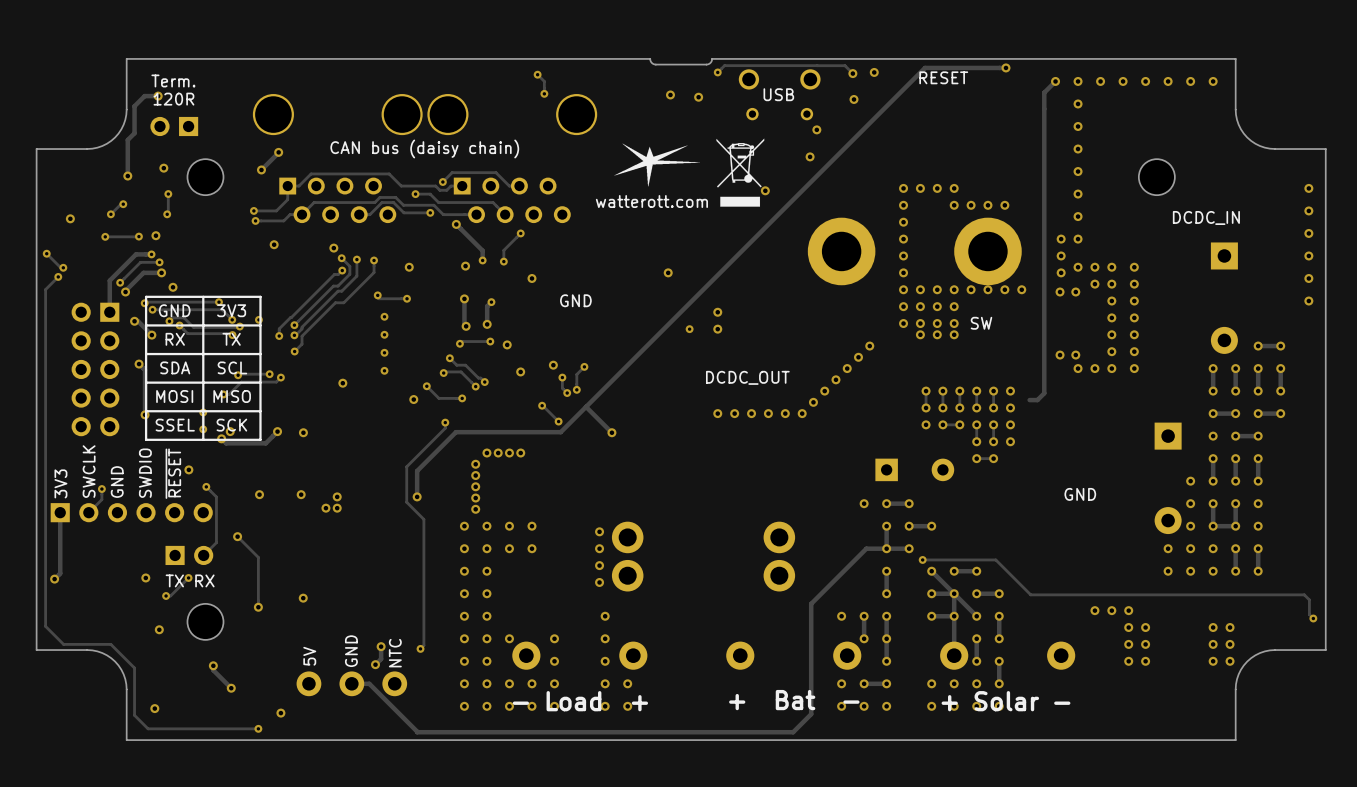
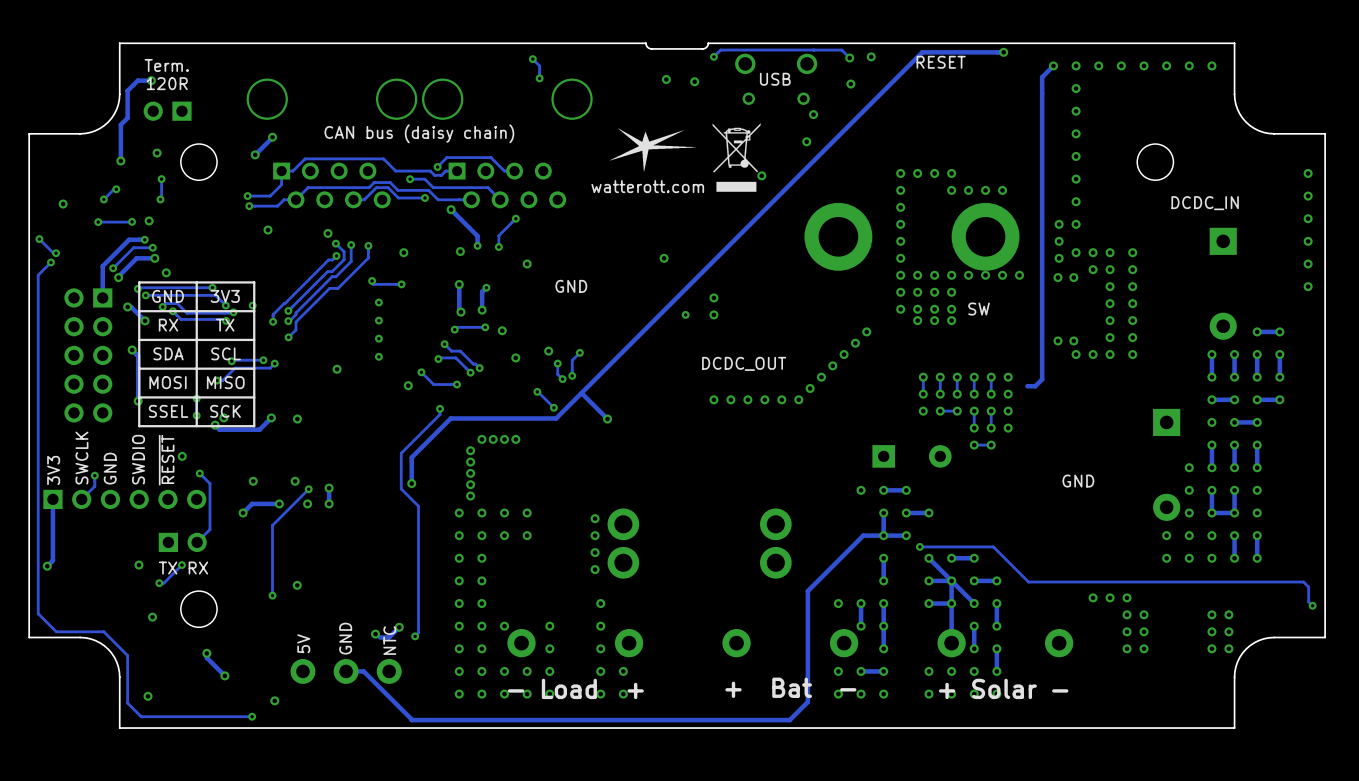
via: (337, 496) -> none
track: none -> (329, 488) (329, 503)
via: none -> (329, 488)
track: none -> (308, 489) (272, 525) (272, 595)
via: none -> (308, 489)
via: (325, 508) -> none
via: (337, 508) -> none
track: none -> (279, 503) (252, 503) (243, 512)
via: none -> (279, 503)
via: none -> (307, 503)
via: none -> (329, 503)
track: (237, 536) (258, 557) (258, 607) -> none
via position: (237, 536) -> (243, 512)
via: (258, 607) -> none
via: none -> (272, 595)
track: none -> (399, 627) (389, 637) (380, 637)
track: (381, 646) (381, 659) (375, 664) -> none
via position: (375, 664) -> (399, 627)

